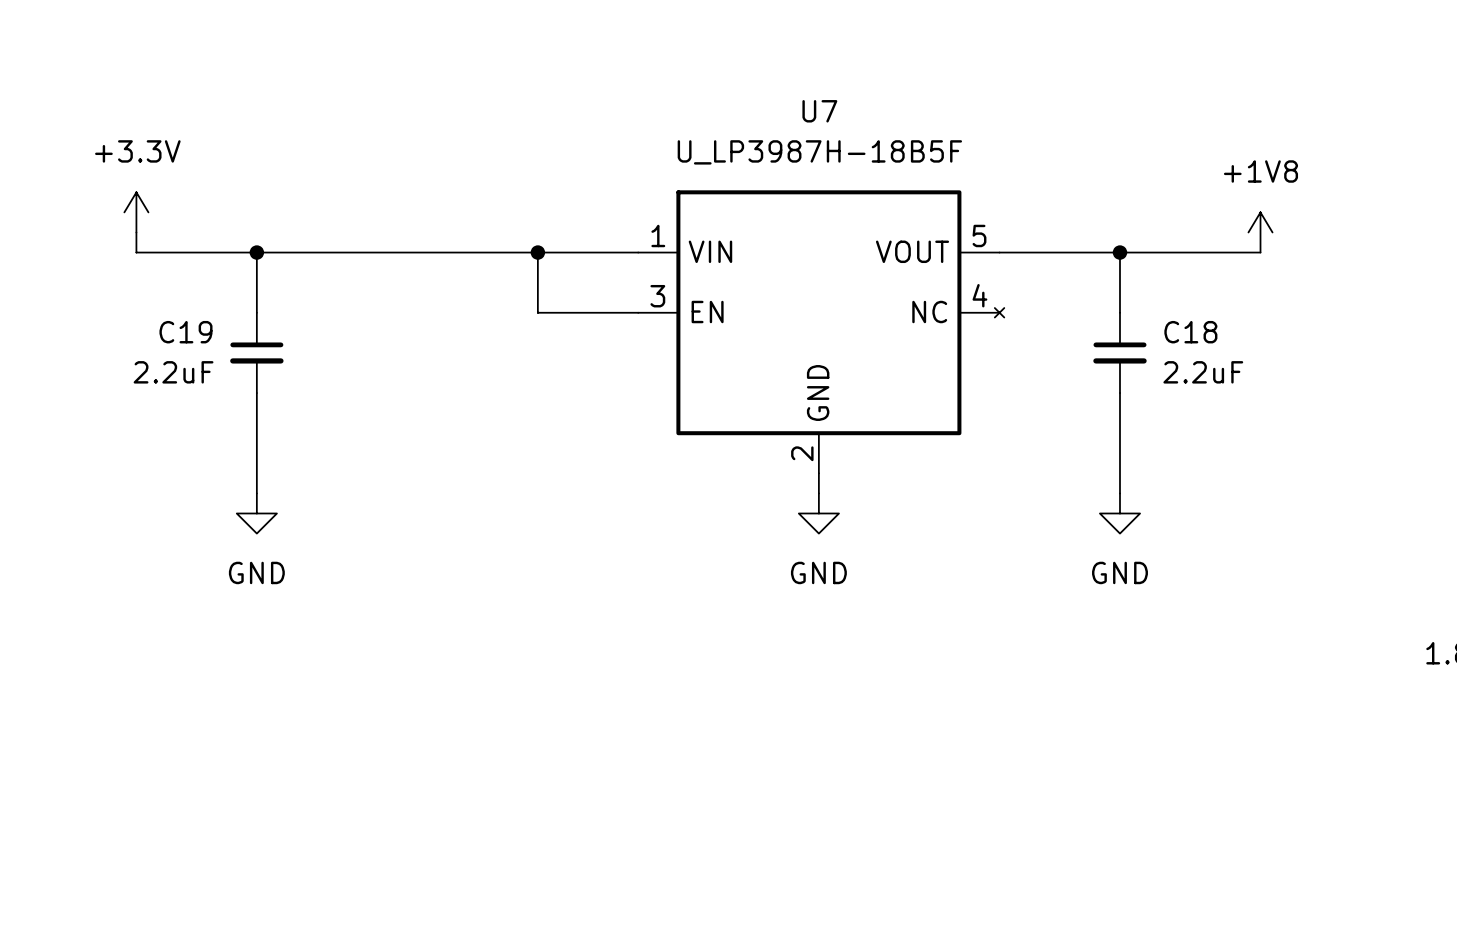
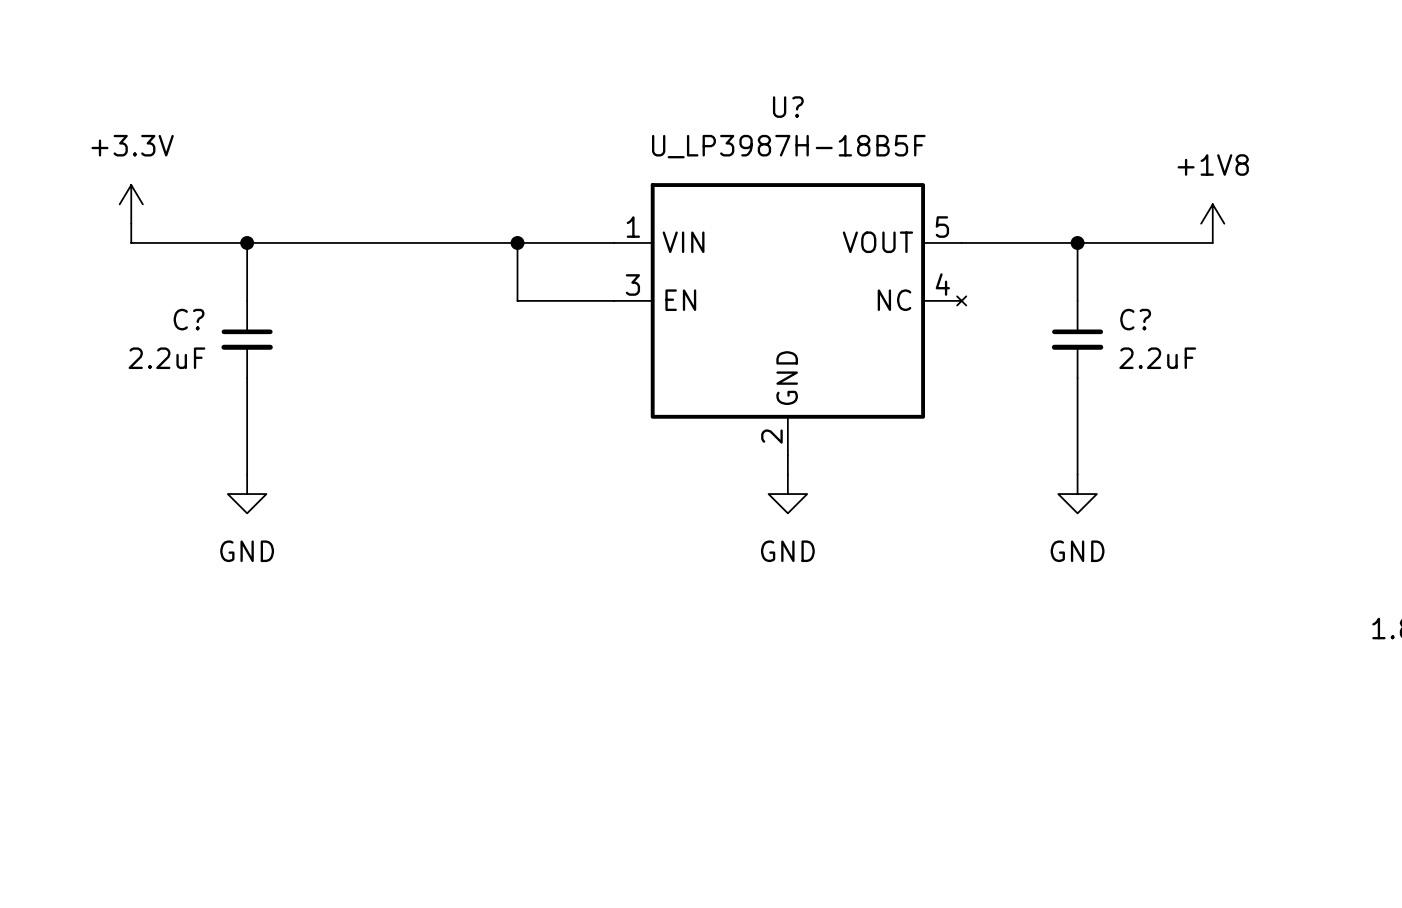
U7 name: U7 (819, 111) -> U? (788, 107)
C19 name: C19 (185, 332) -> C? (189, 319)
C18 name: C18 (1190, 332) -> C? (1135, 319)

